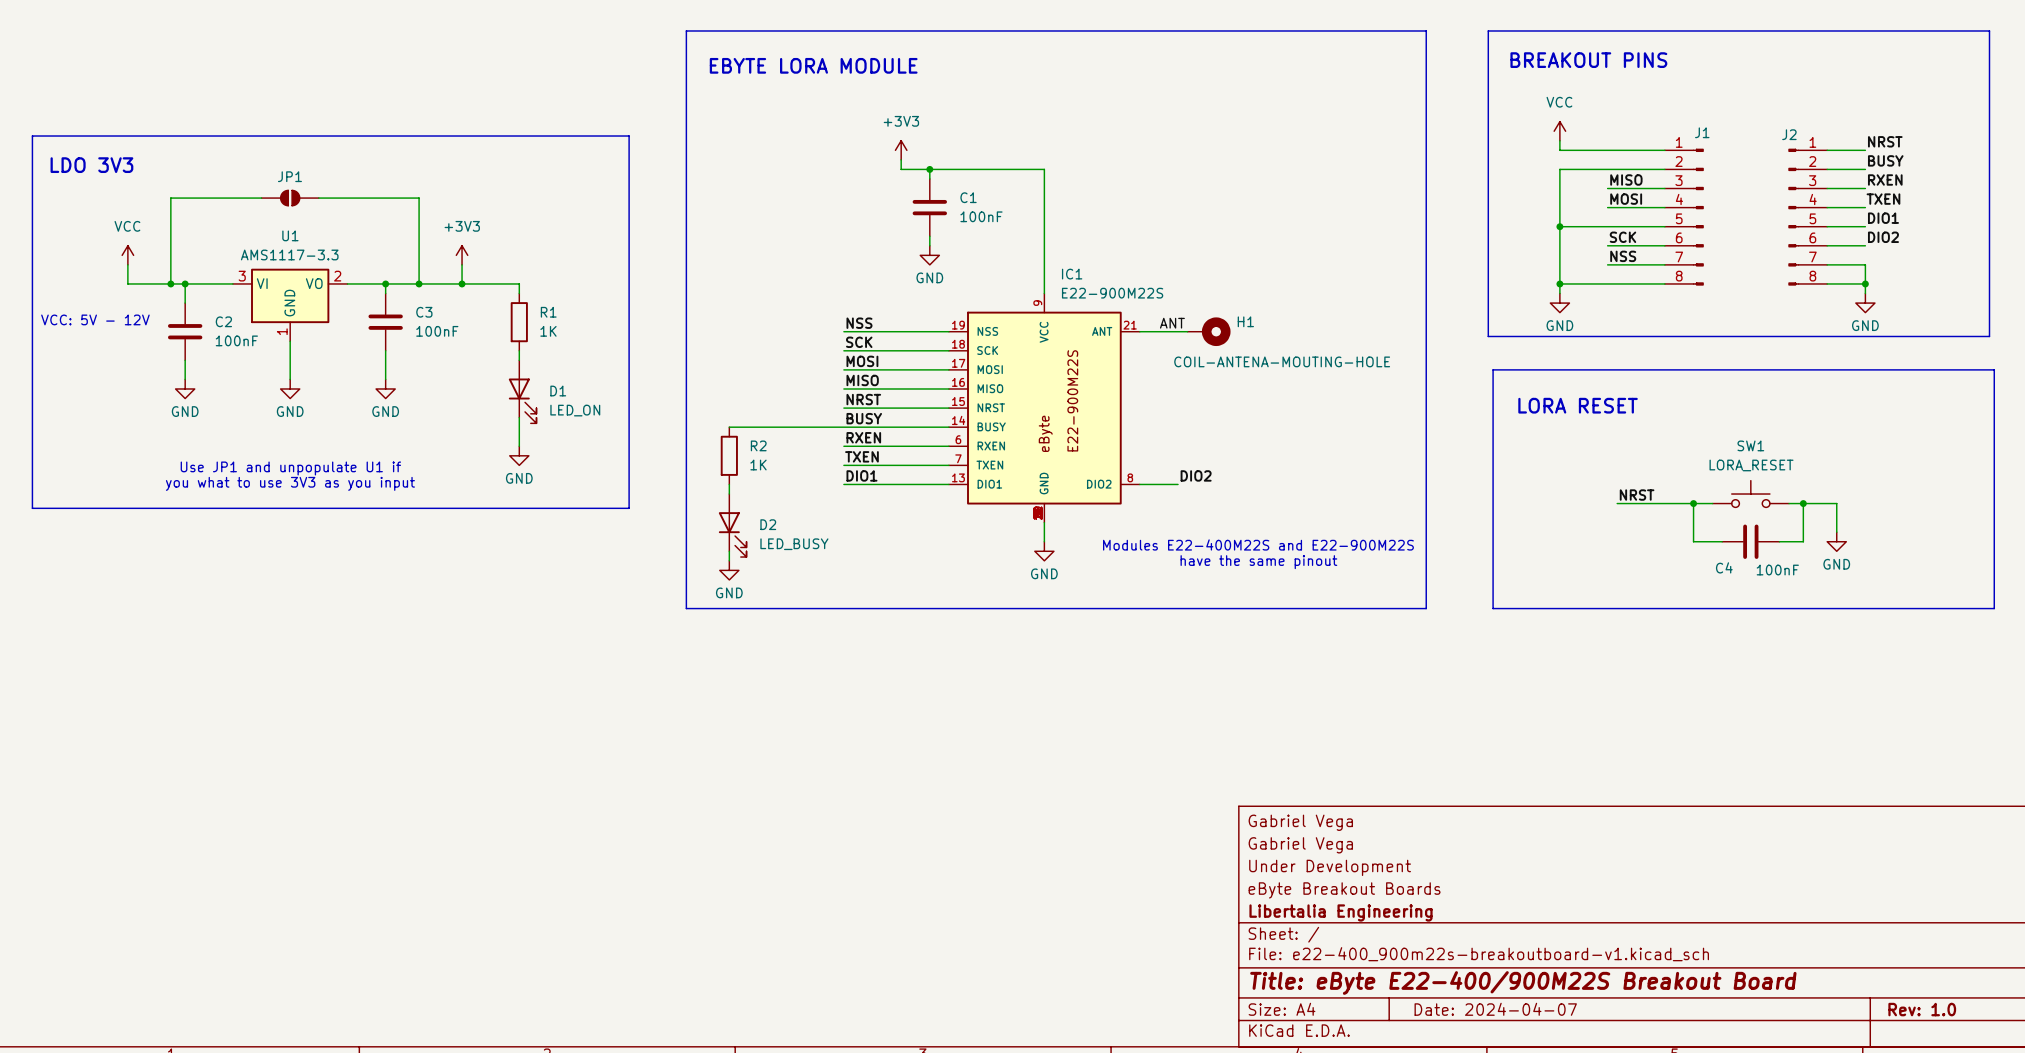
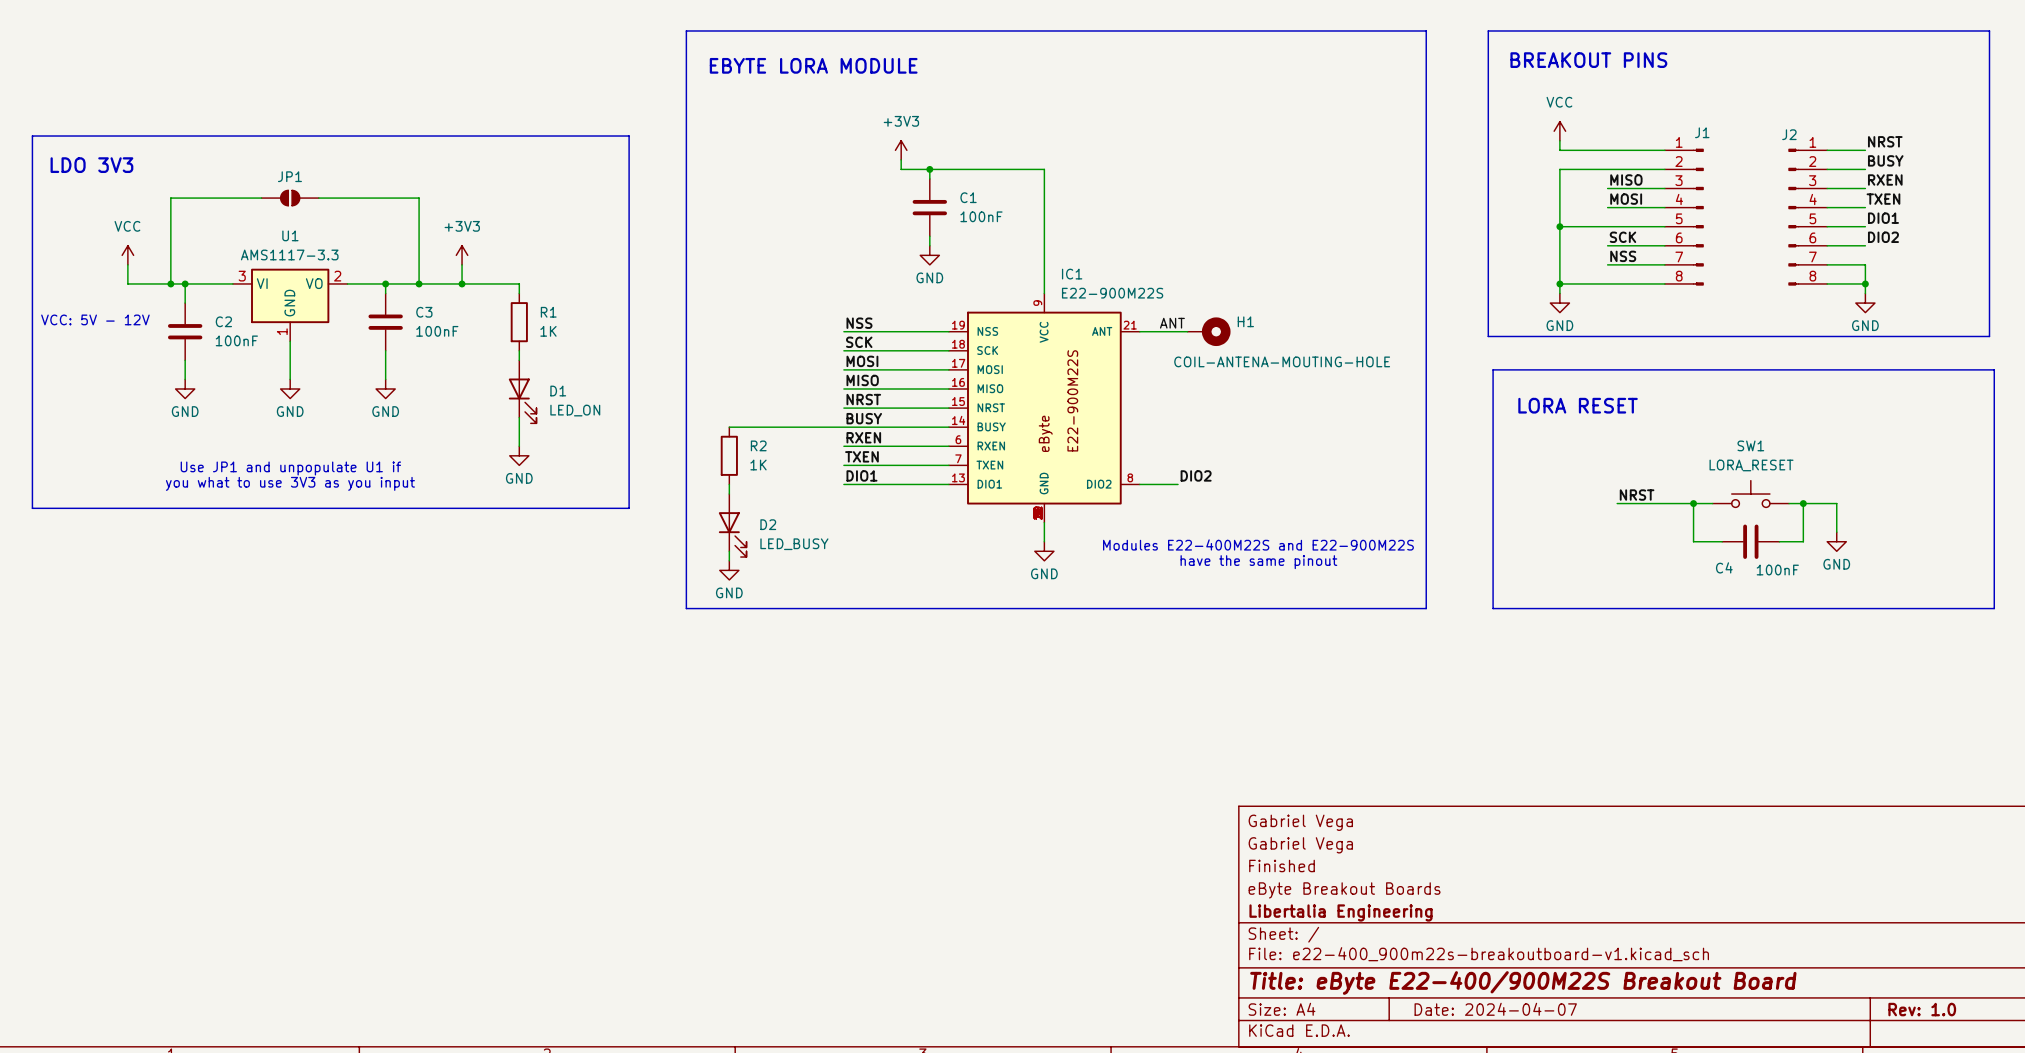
title block: Under Development (1330, 867) -> Finished (1282, 865)

